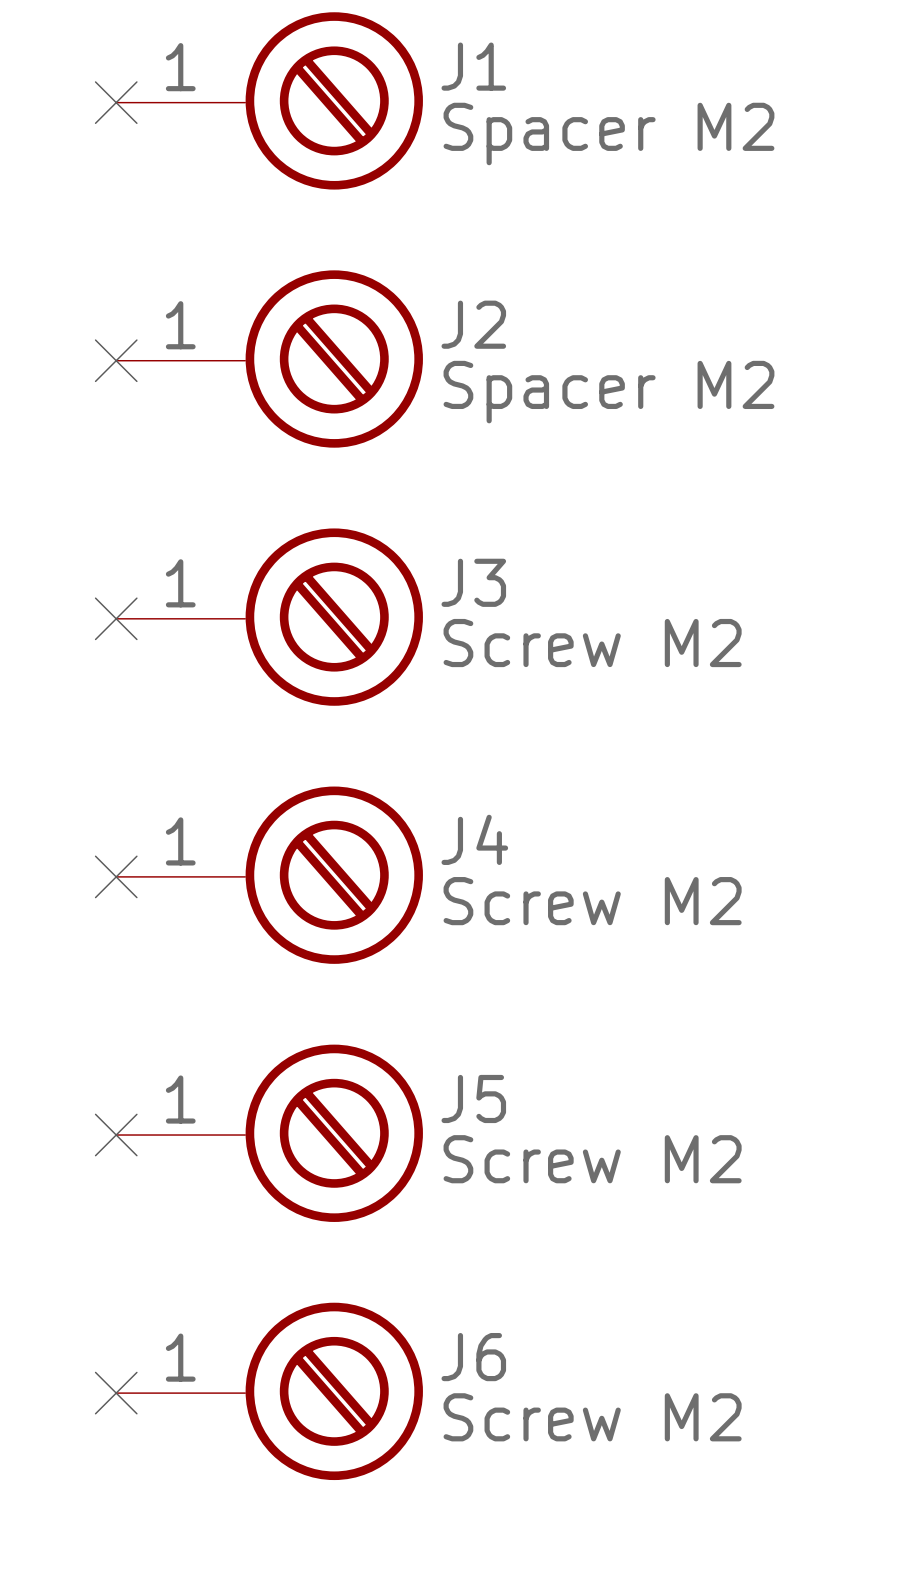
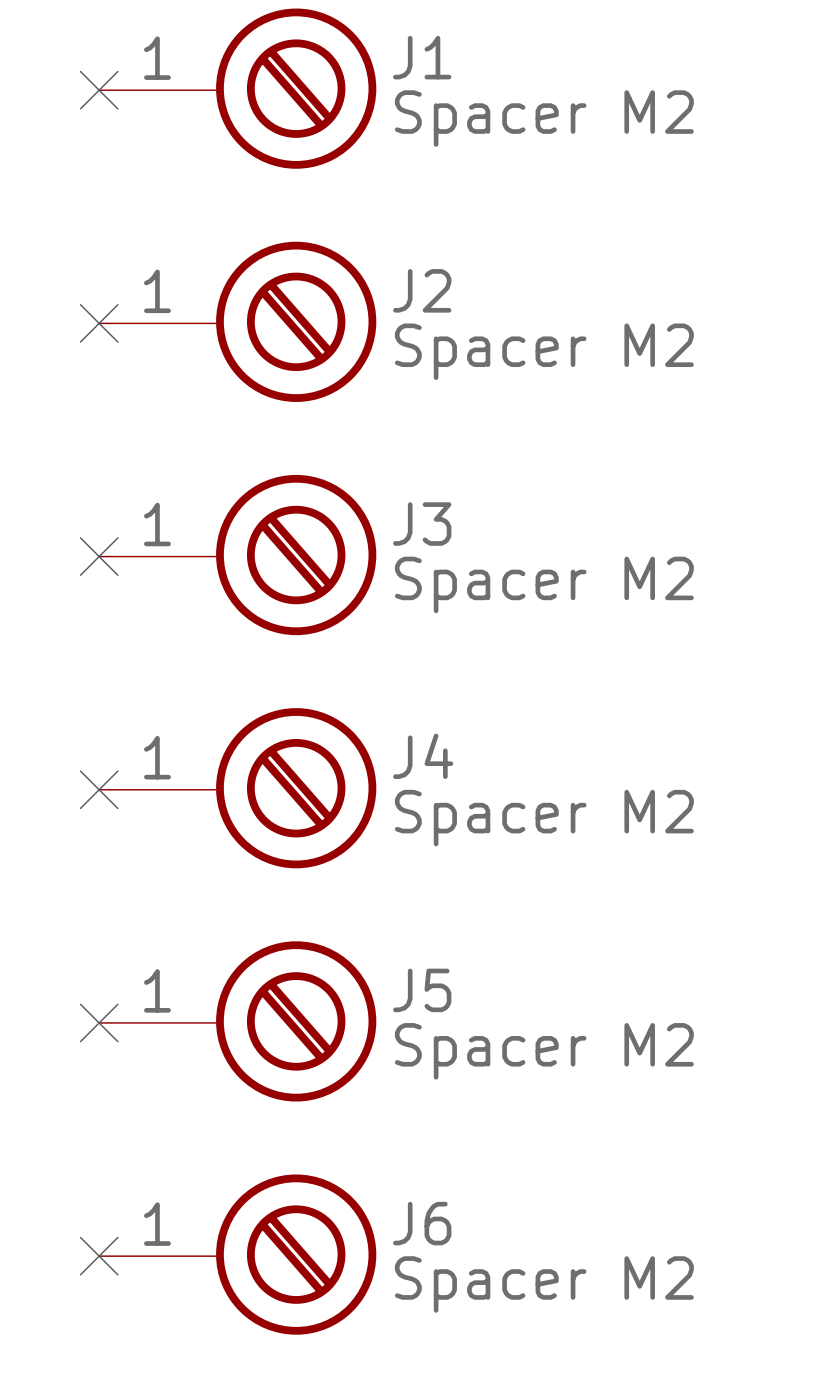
J3 value: Screw M2 (592, 643) -> Spacer M2 (544, 584)
J4 value: Screw M2 (592, 901) -> Spacer M2 (544, 818)
J5 value: Screw M2 (592, 1159) -> Spacer M2 (544, 1051)
J6 value: Screw M2 (592, 1417) -> Spacer M2 (544, 1284)

